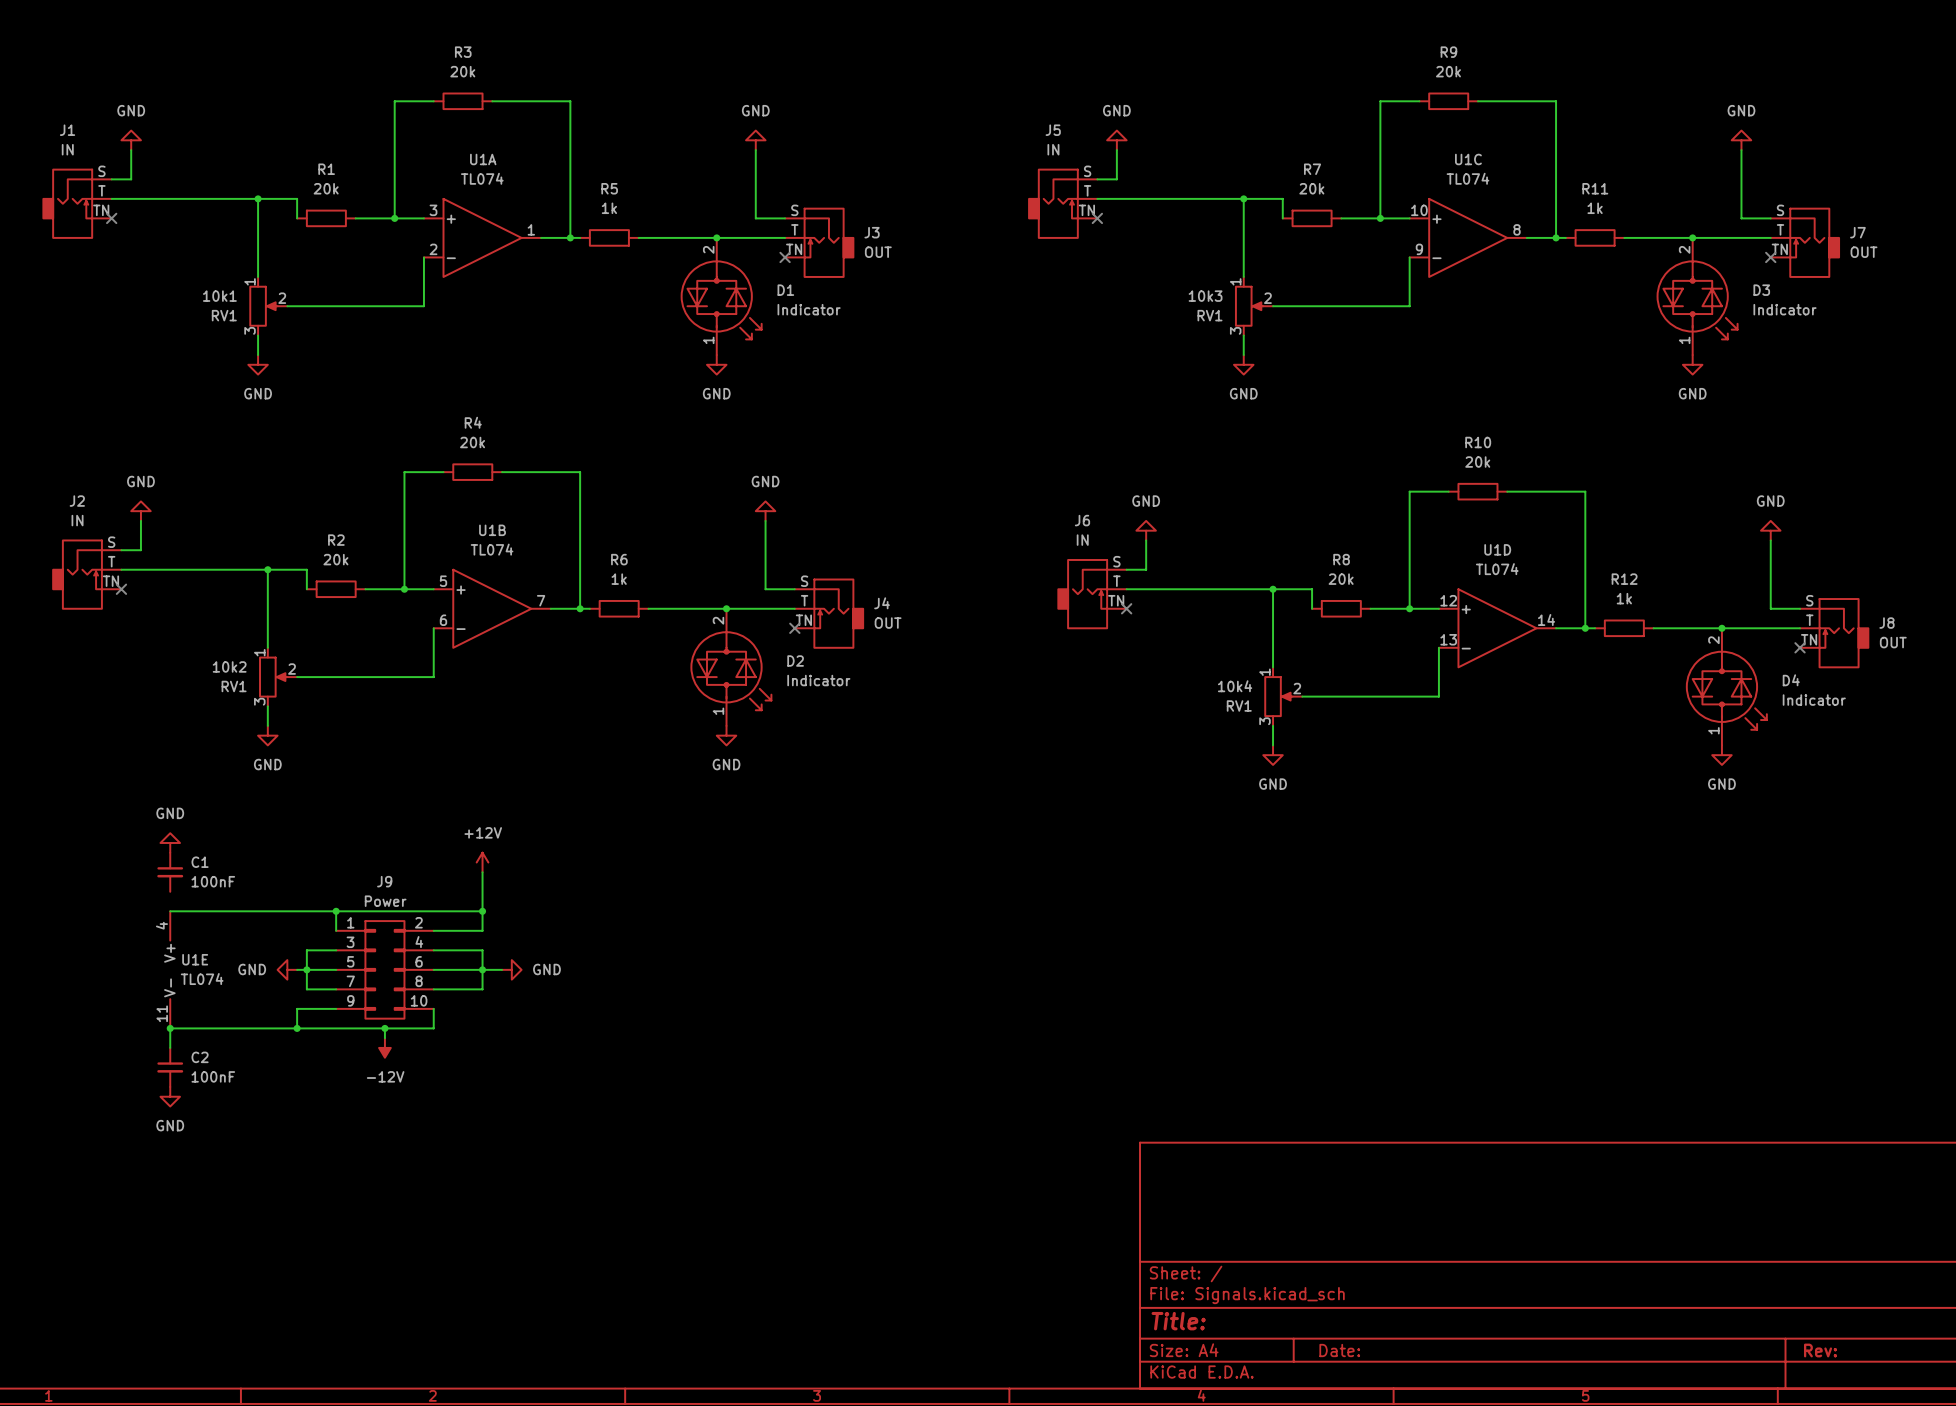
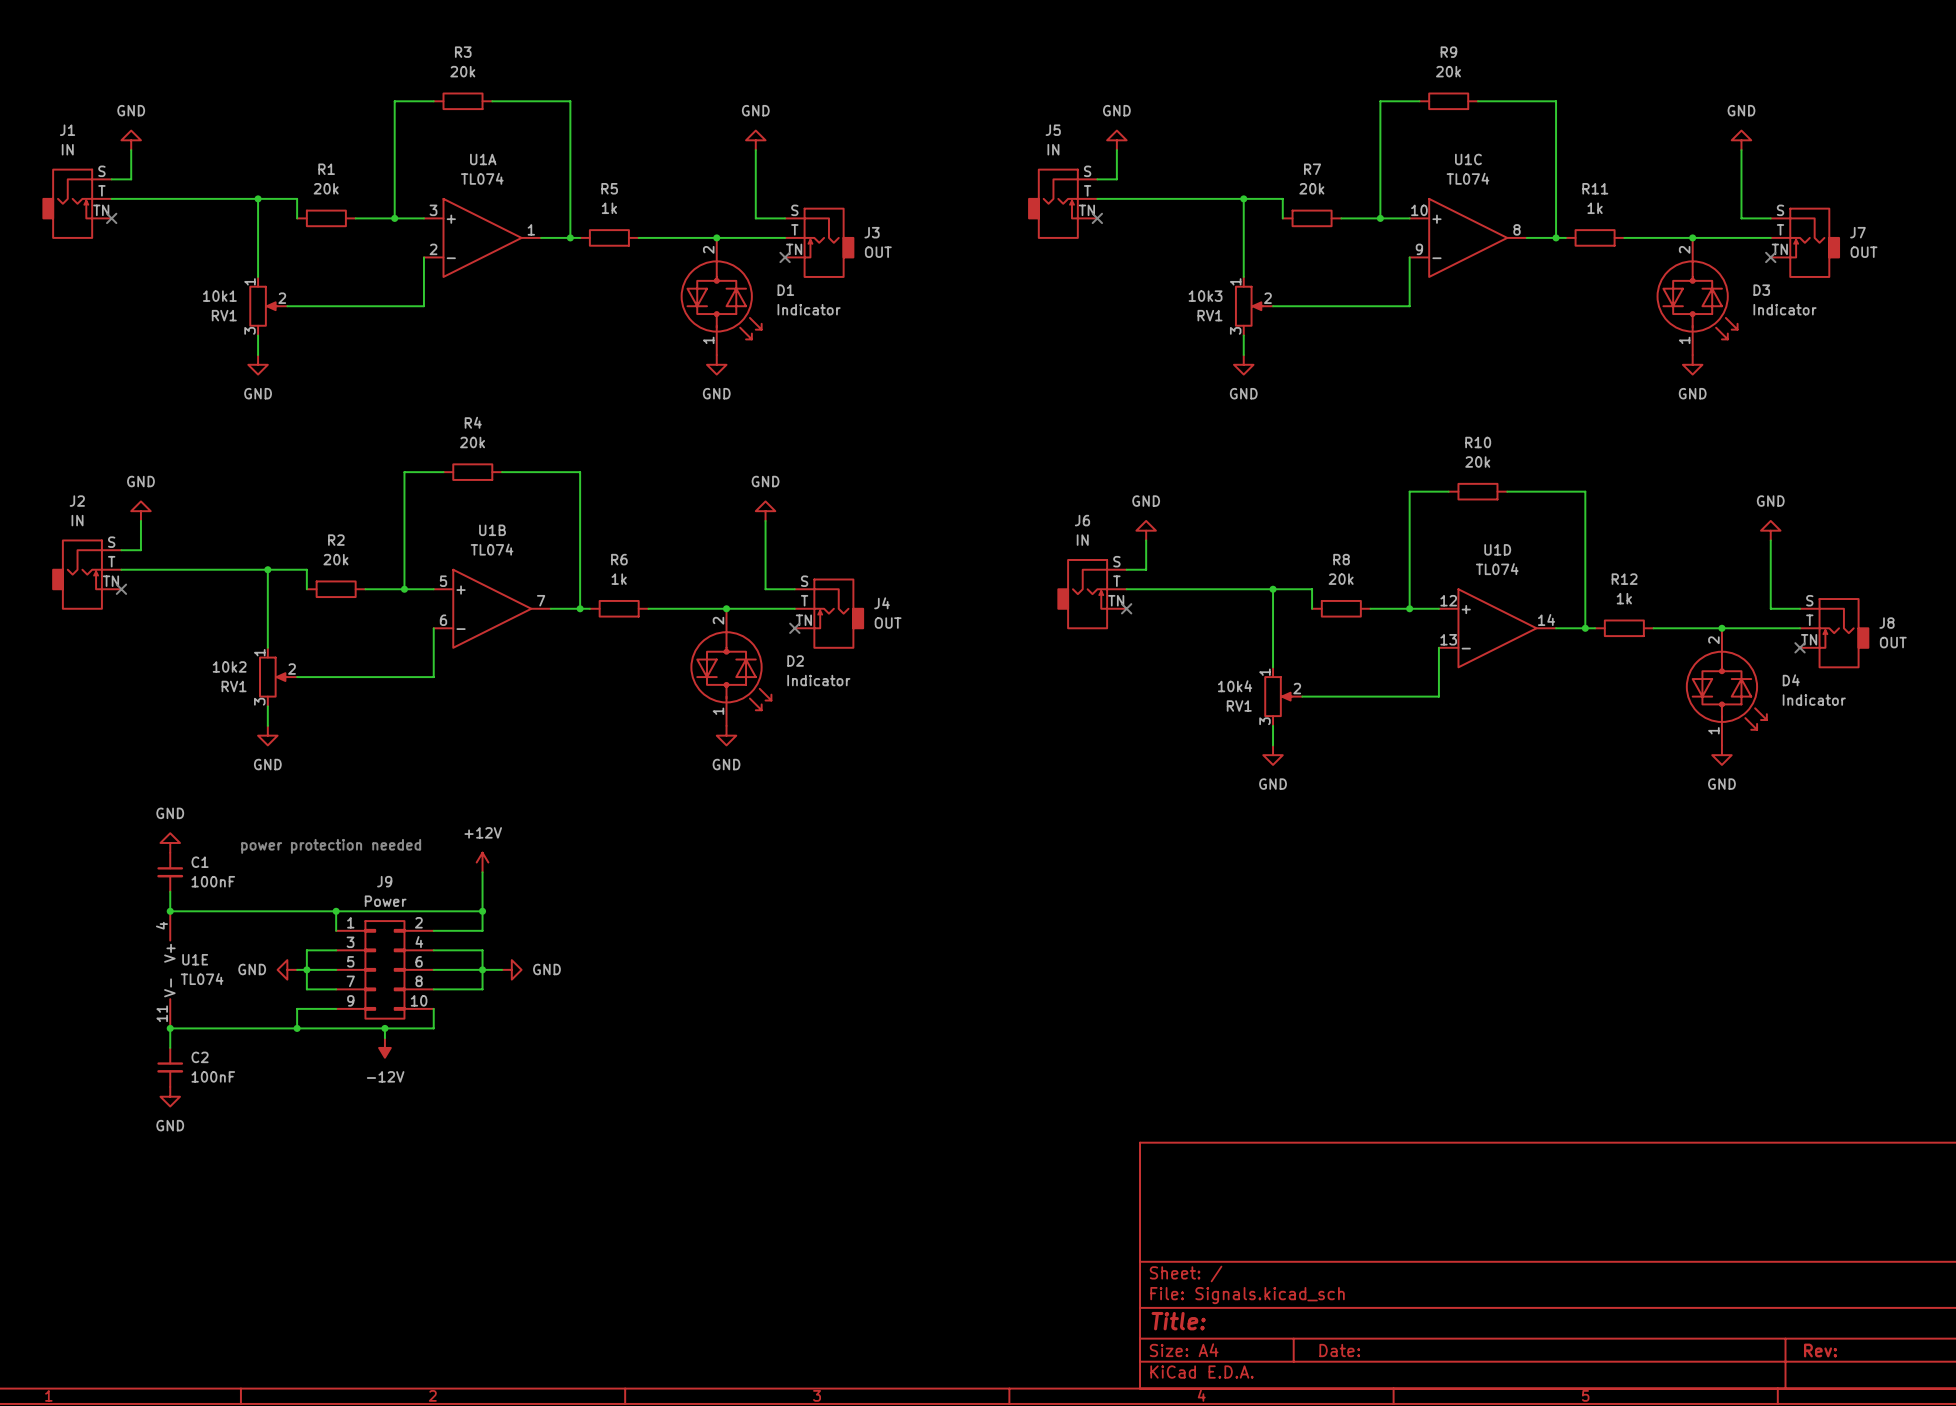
text: none -> power protection needed (331, 846)
wire: none -> (170, 891) (170, 911)
junction: none -> (170, 911)

